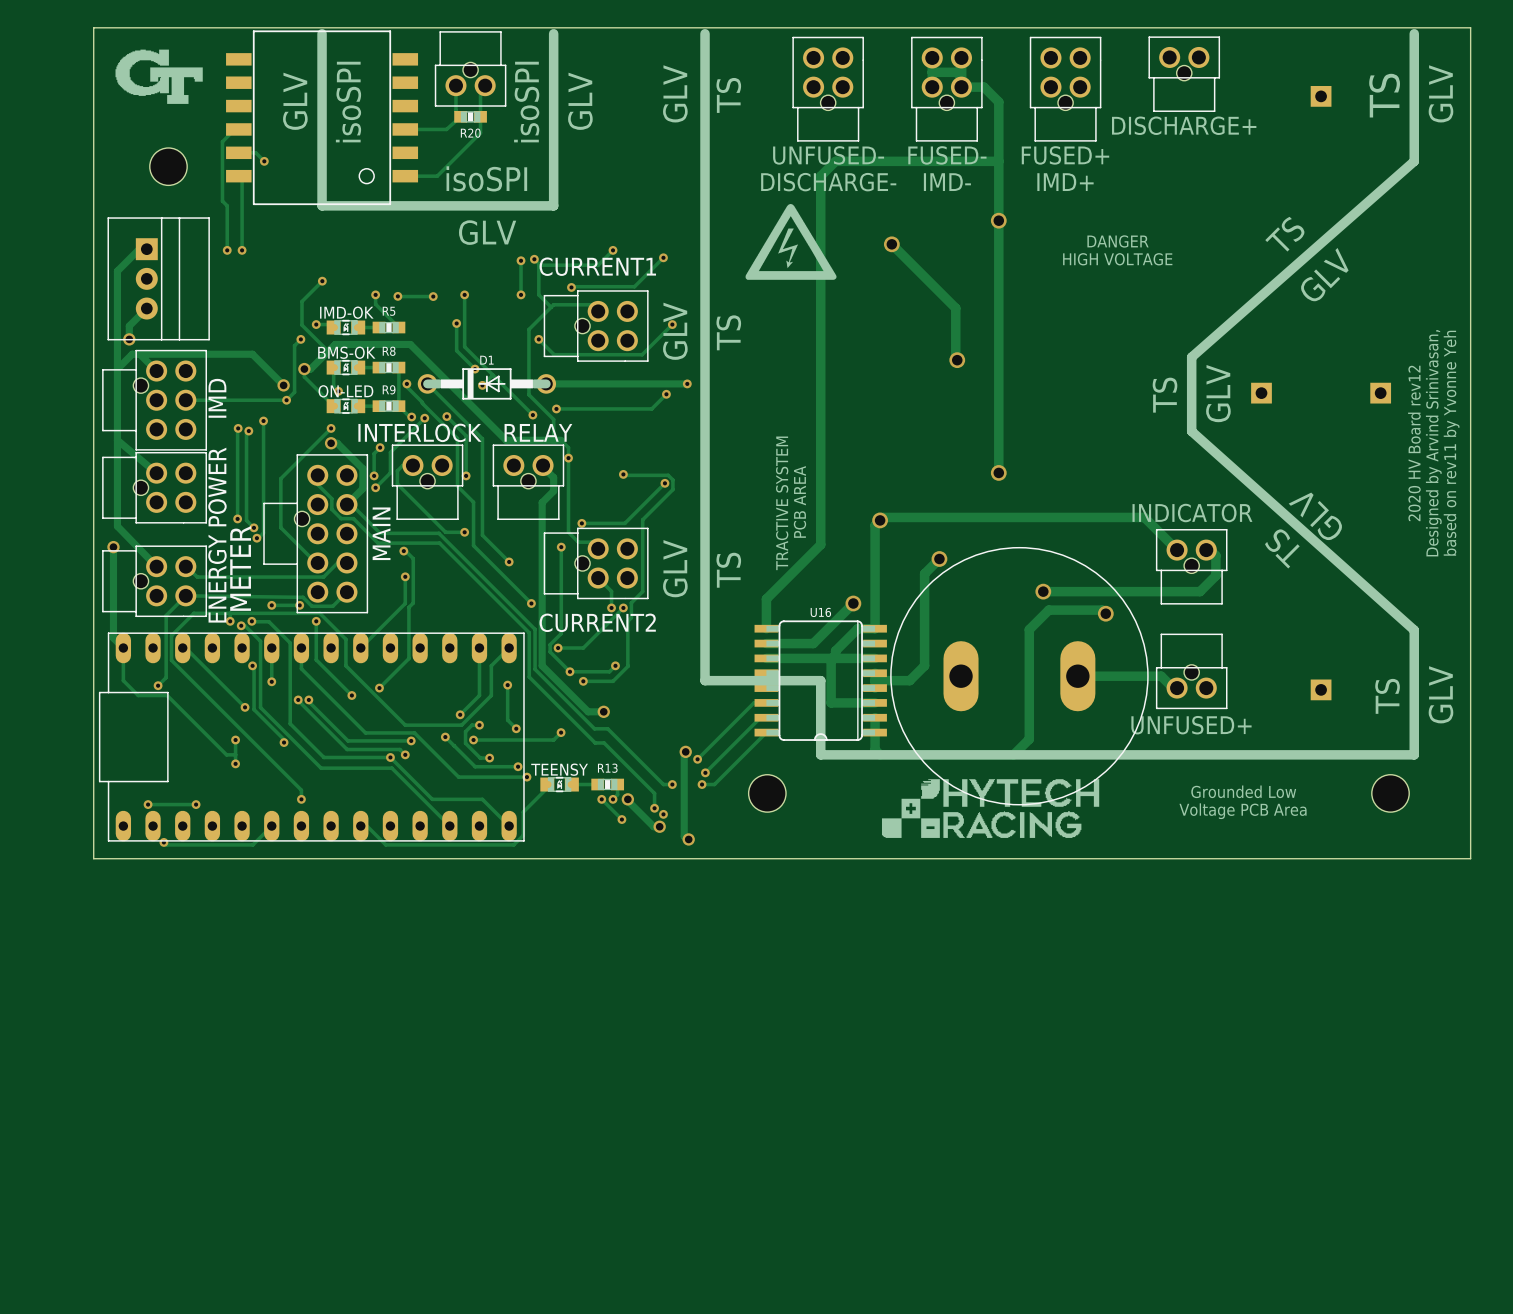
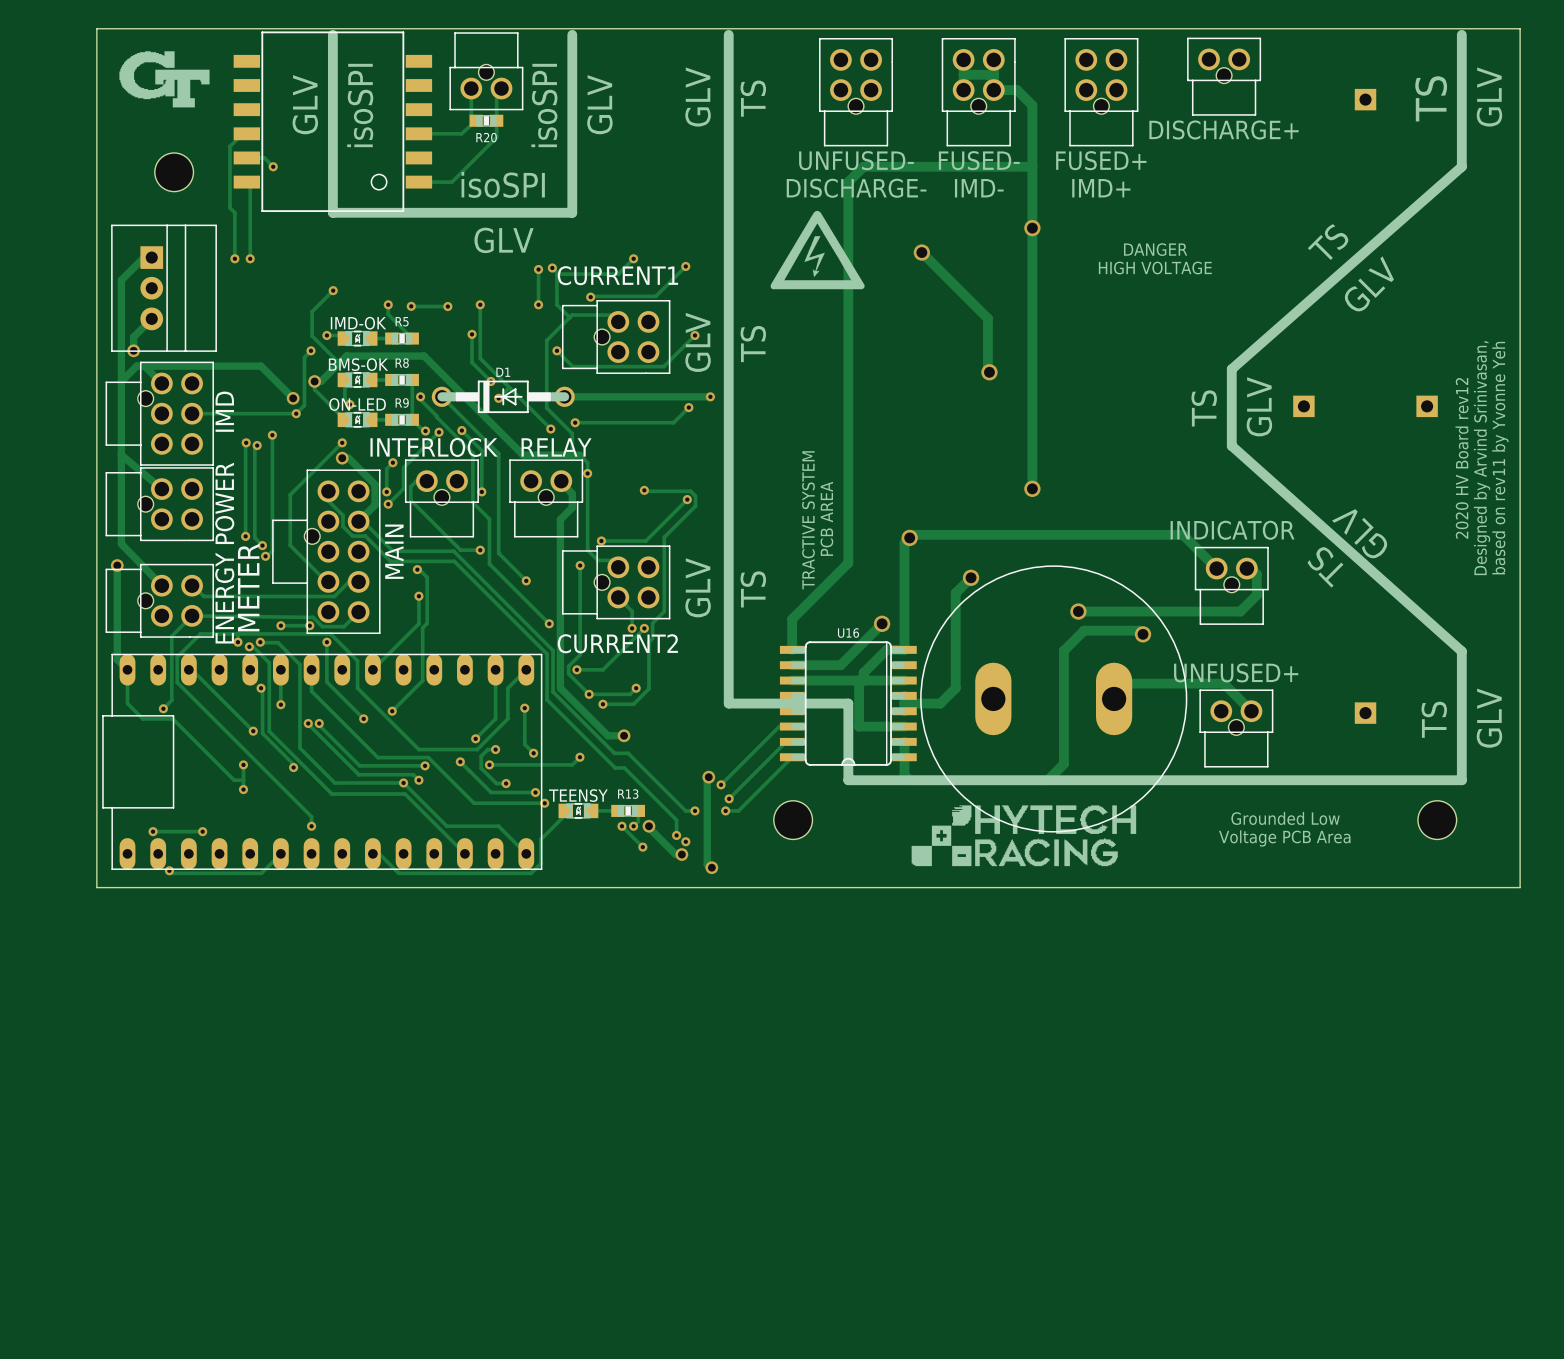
part rotation: 0° (1191, 671) -> 180° (1236, 728)
track: (1077, 676) (1161, 676) (1175, 690) (1177, 688) -> (1114, 698) (1129, 683) (1223, 683) (1251, 711)
text position: UNFUSED+ (1191, 725) -> UNFUSED+ (1236, 672)

